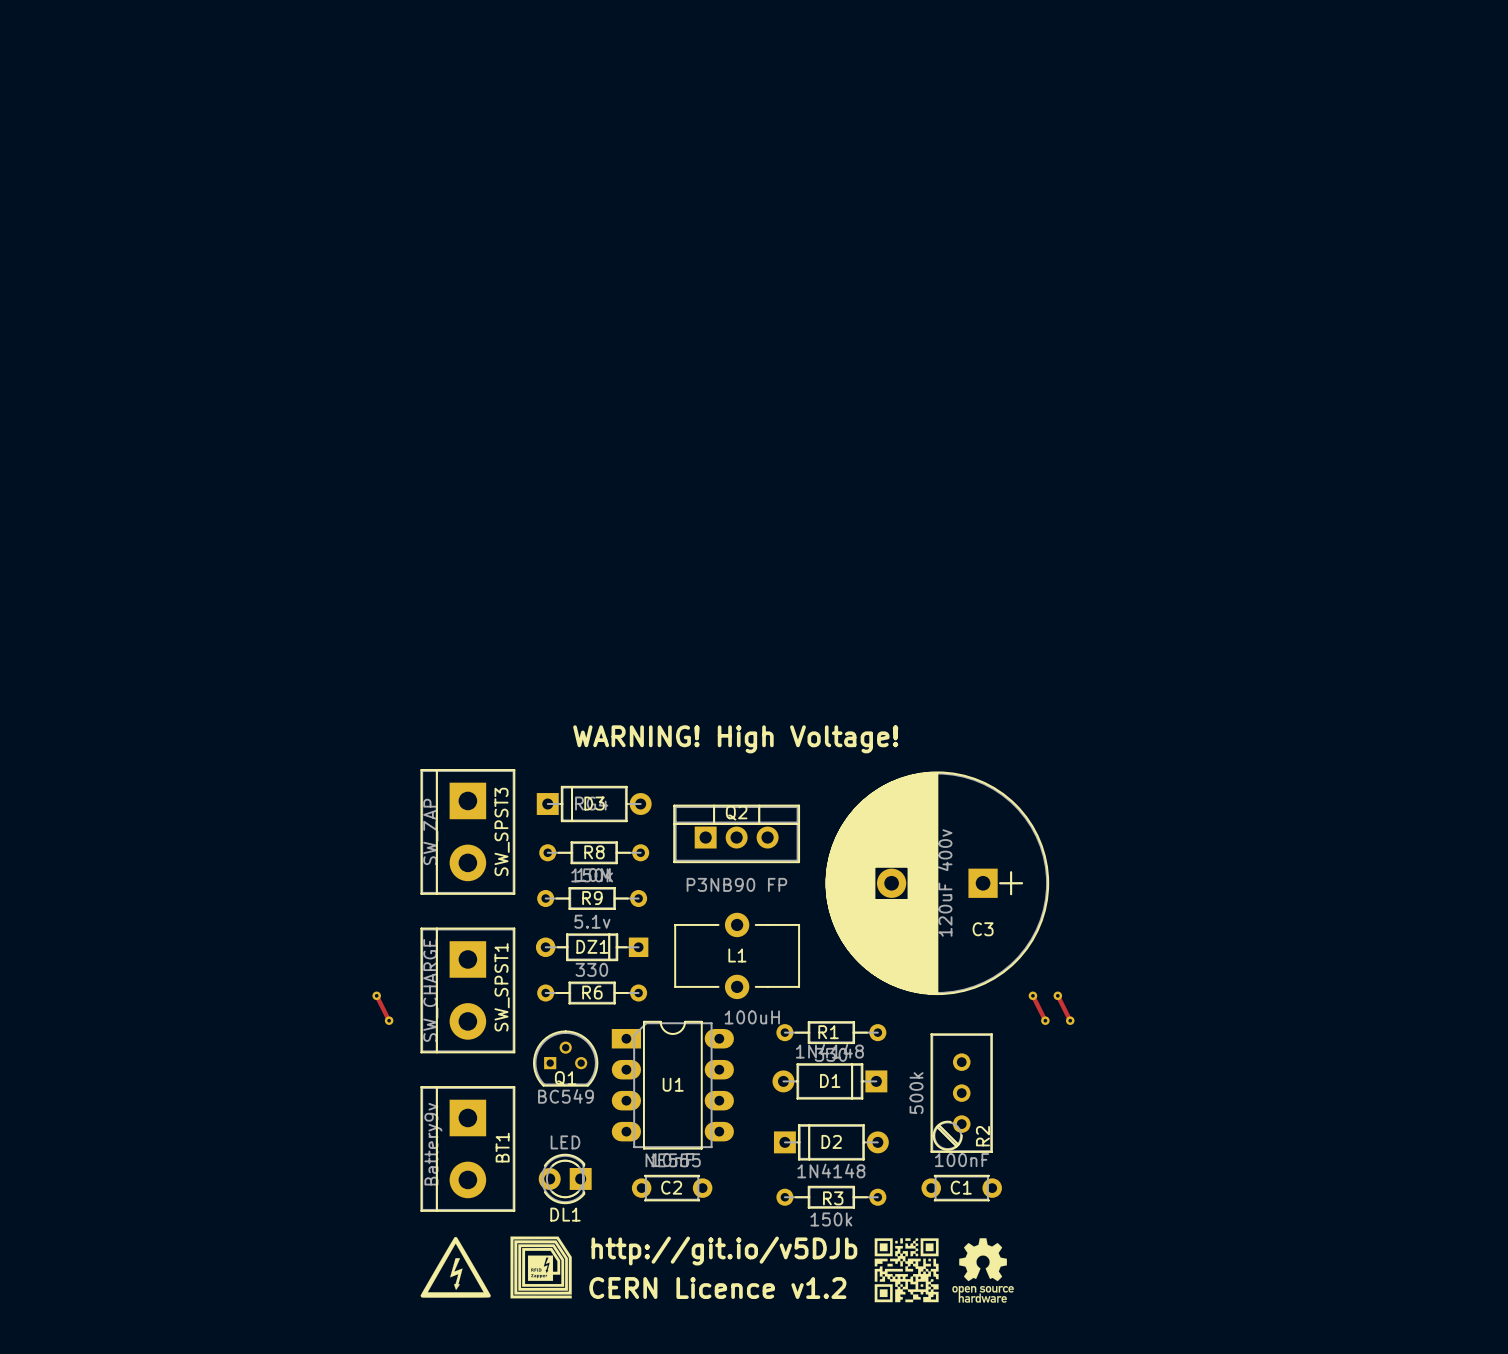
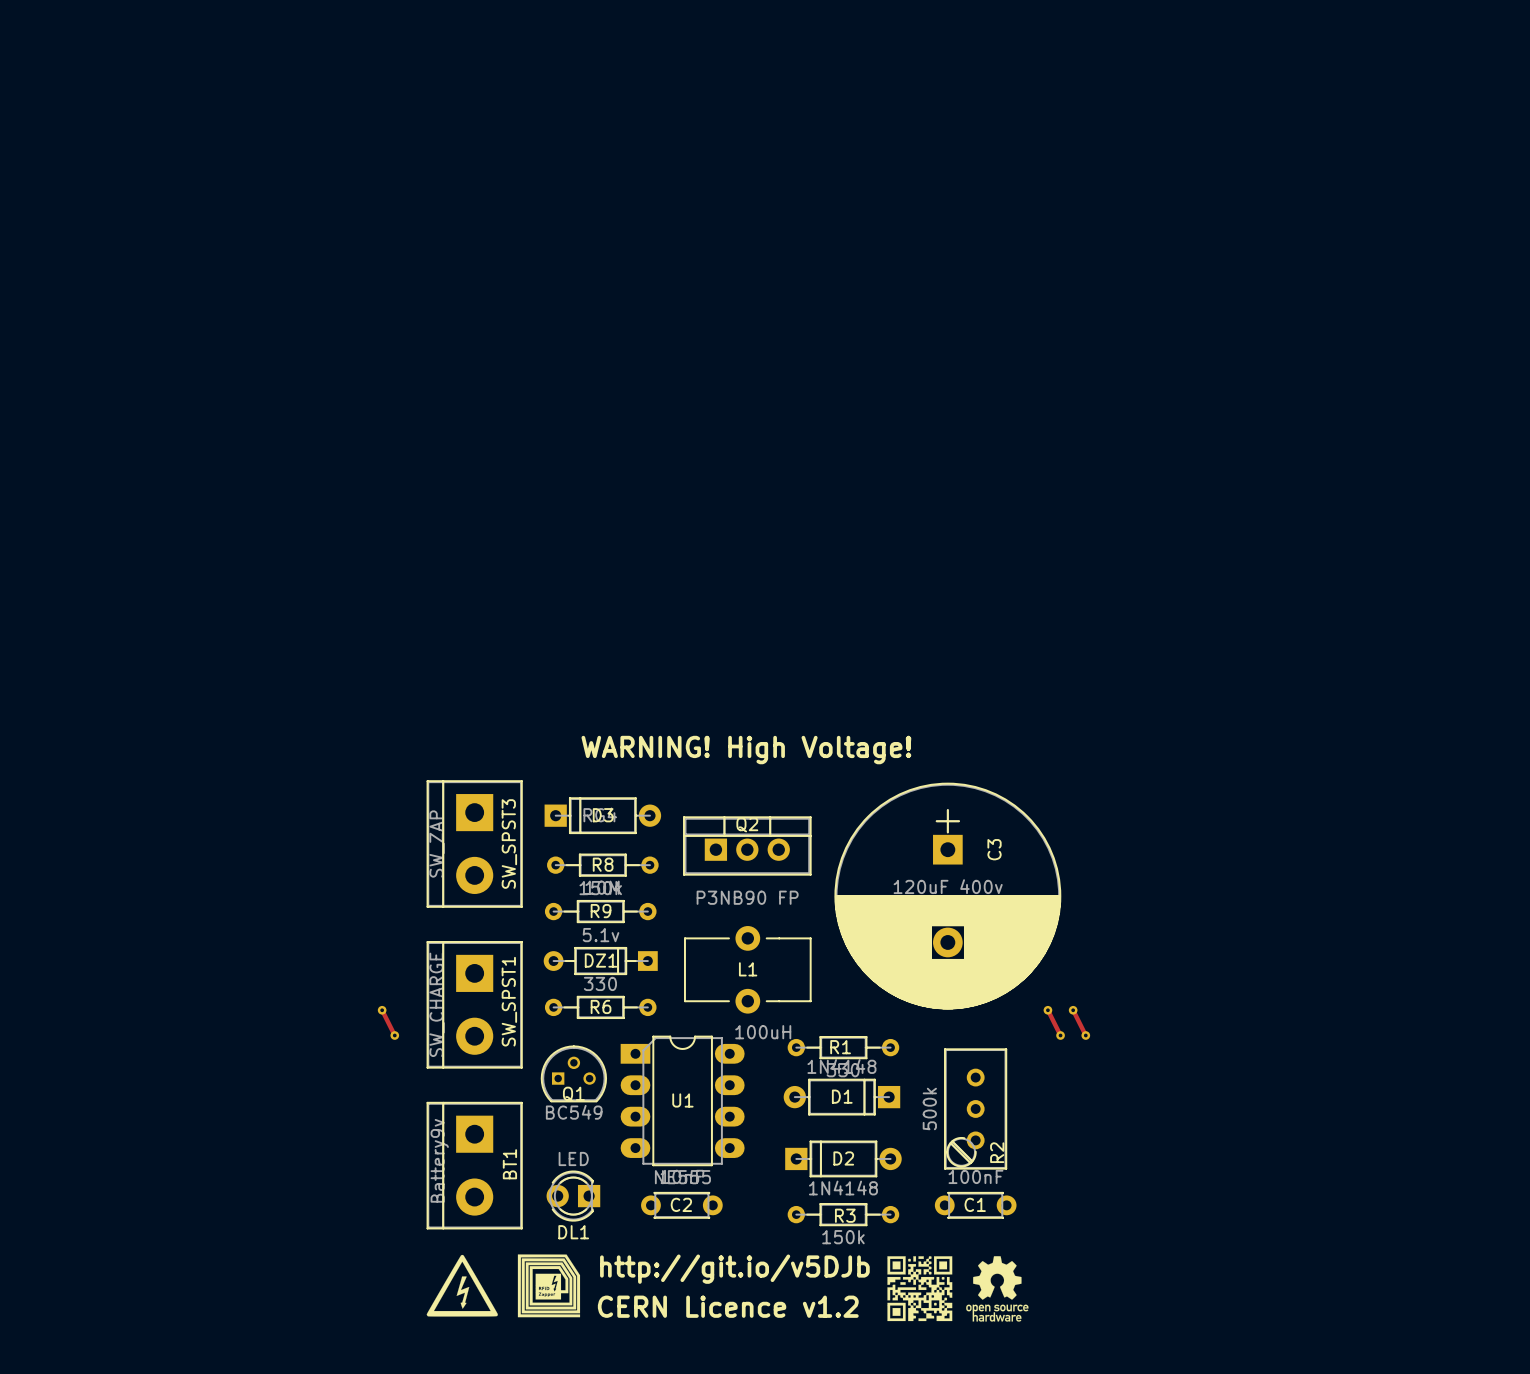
C3 rotation: 0° (937, 883) -> 90° counterclockwise (947, 896)

